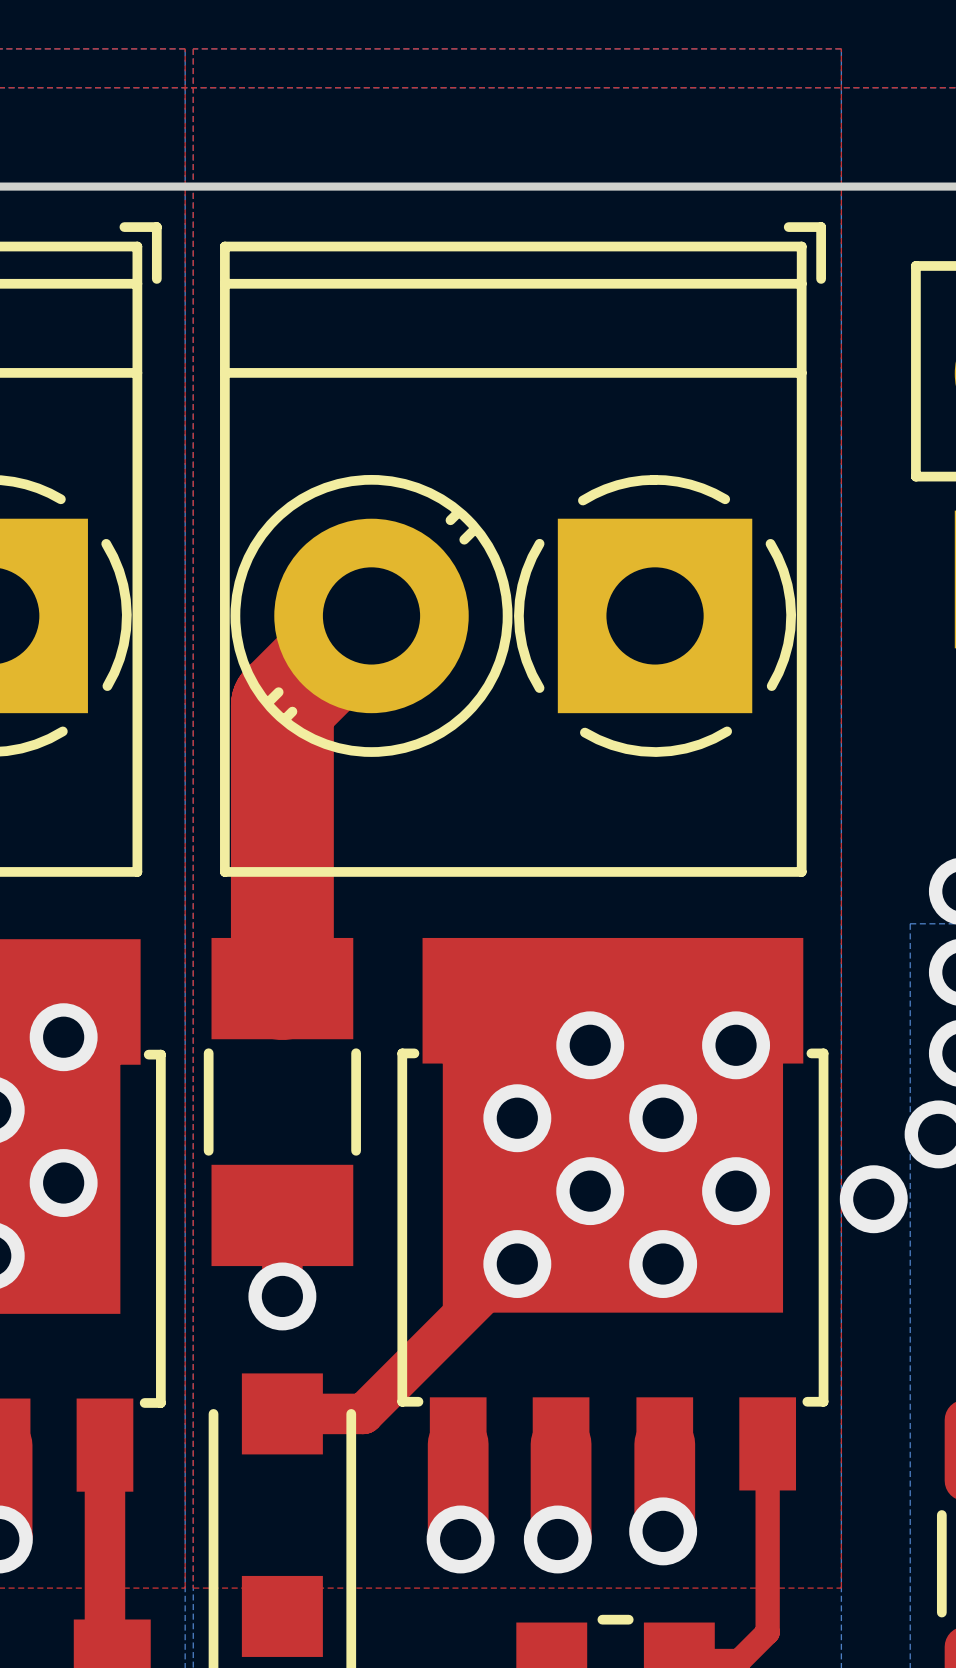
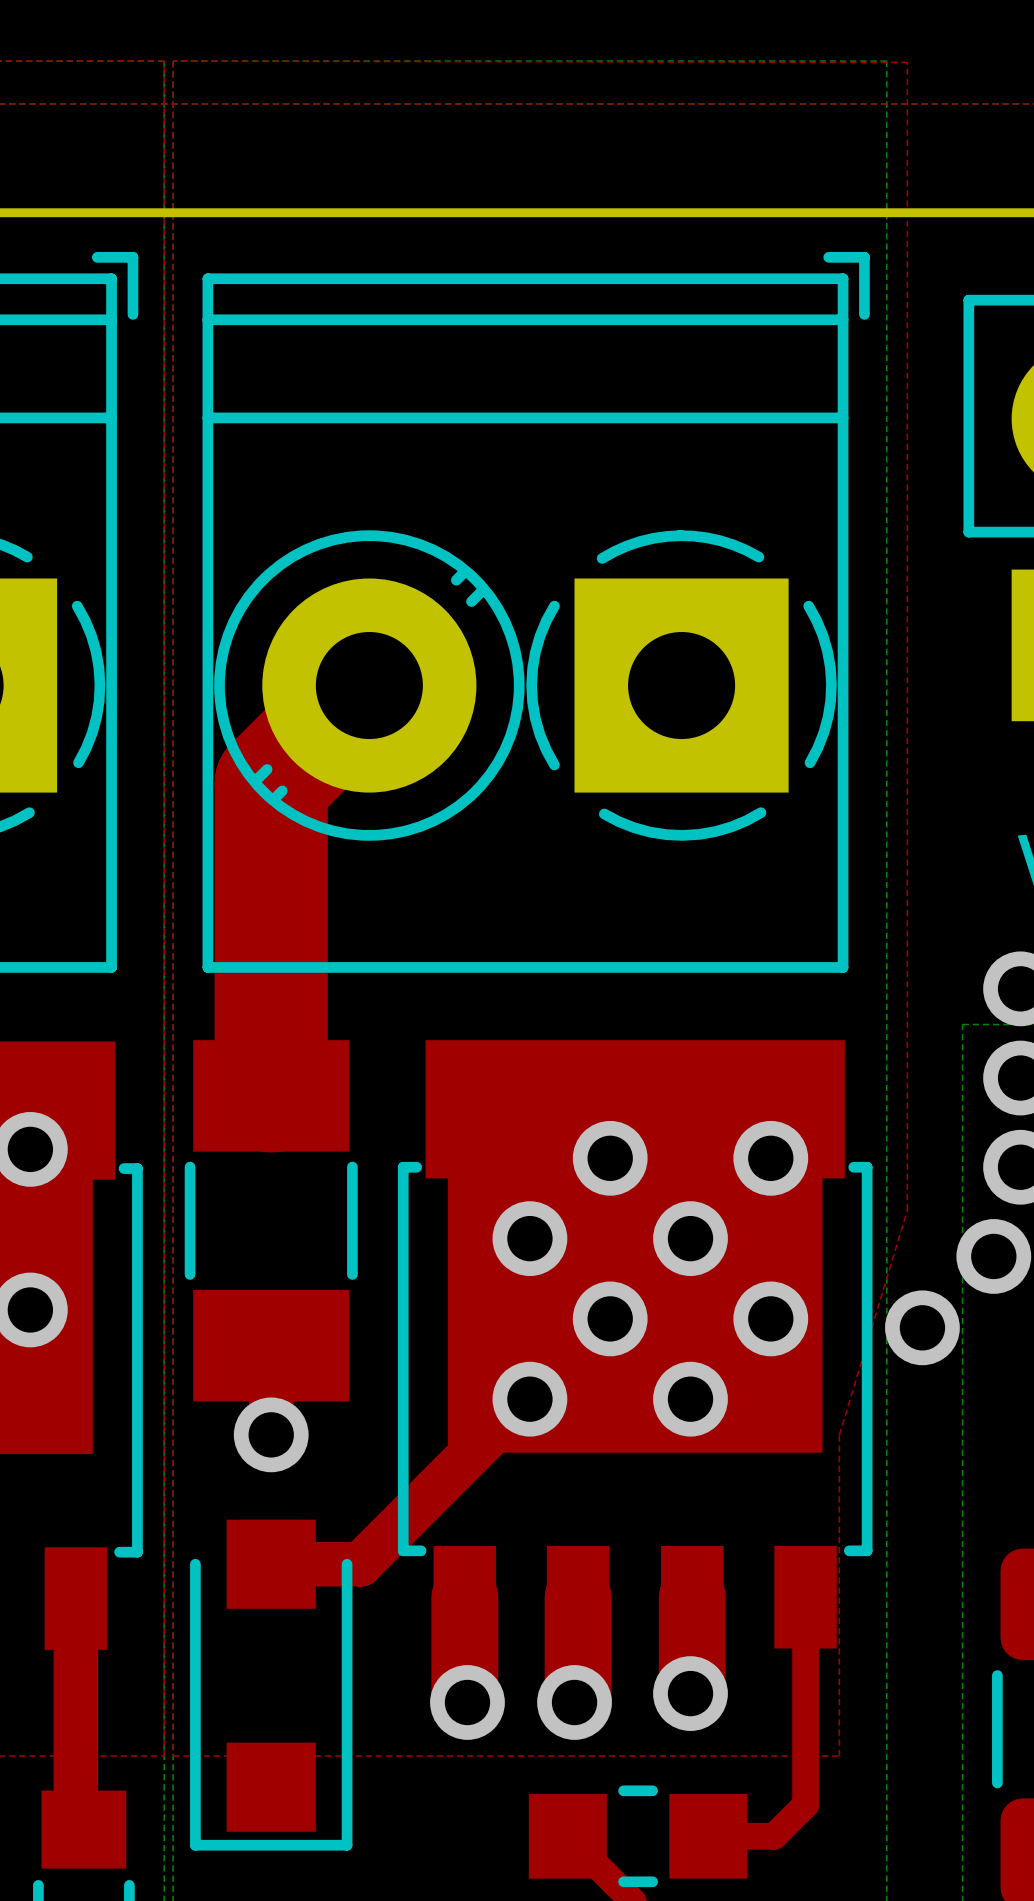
top zone outline: (193, 48) (841, 48) (841, 1588) (798, 1588) -> (173, 61) (907, 62) (907, 1210) (839, 1435) (839, 1756)

